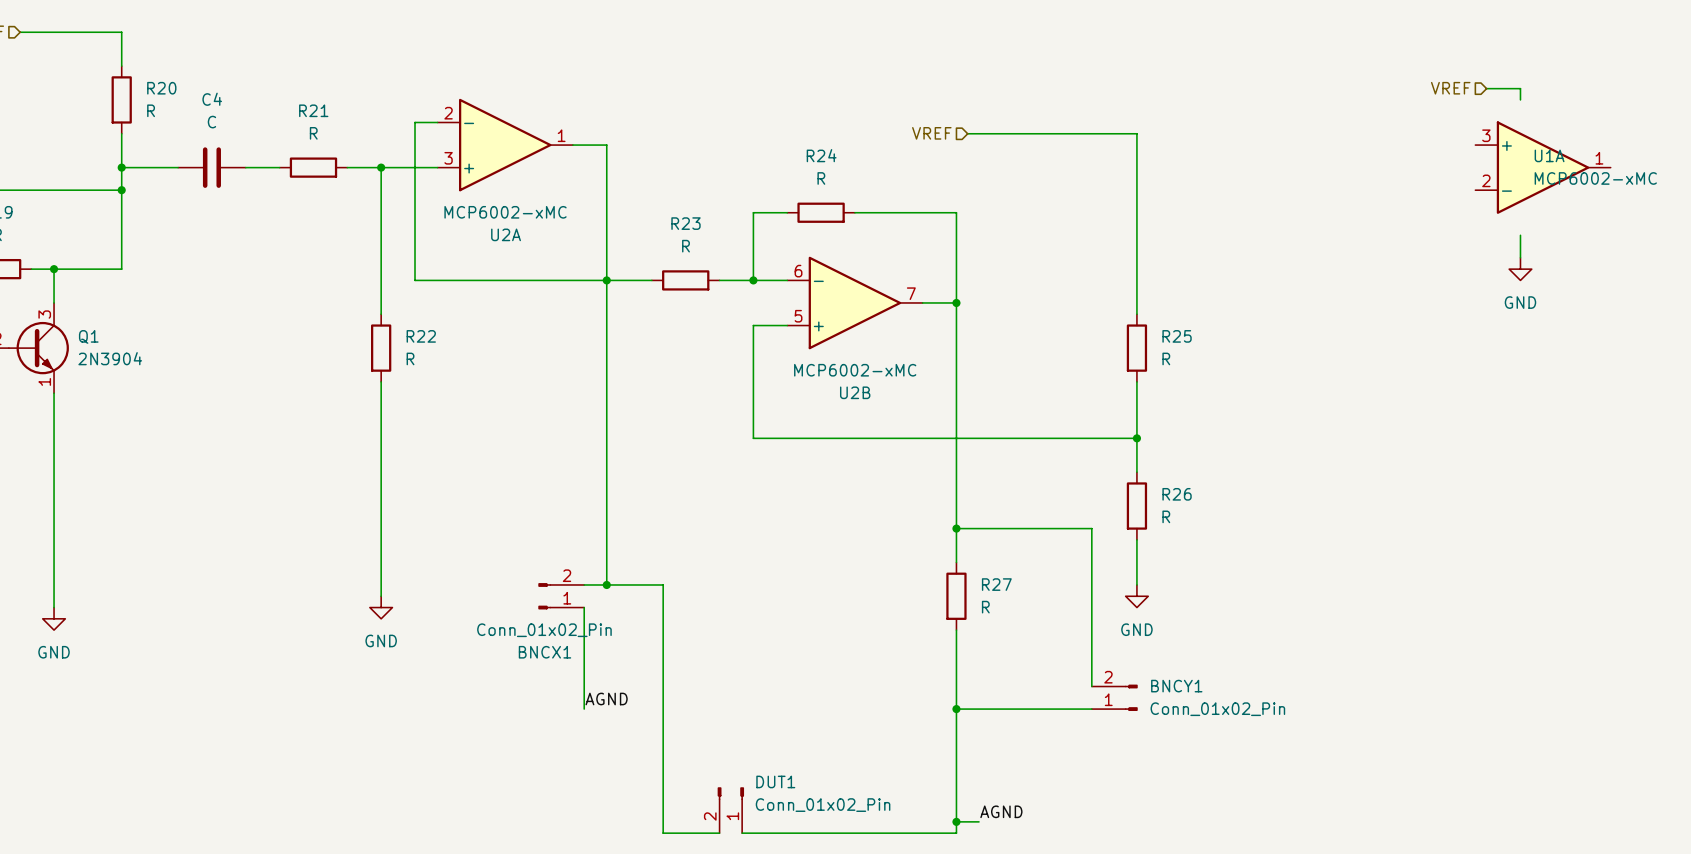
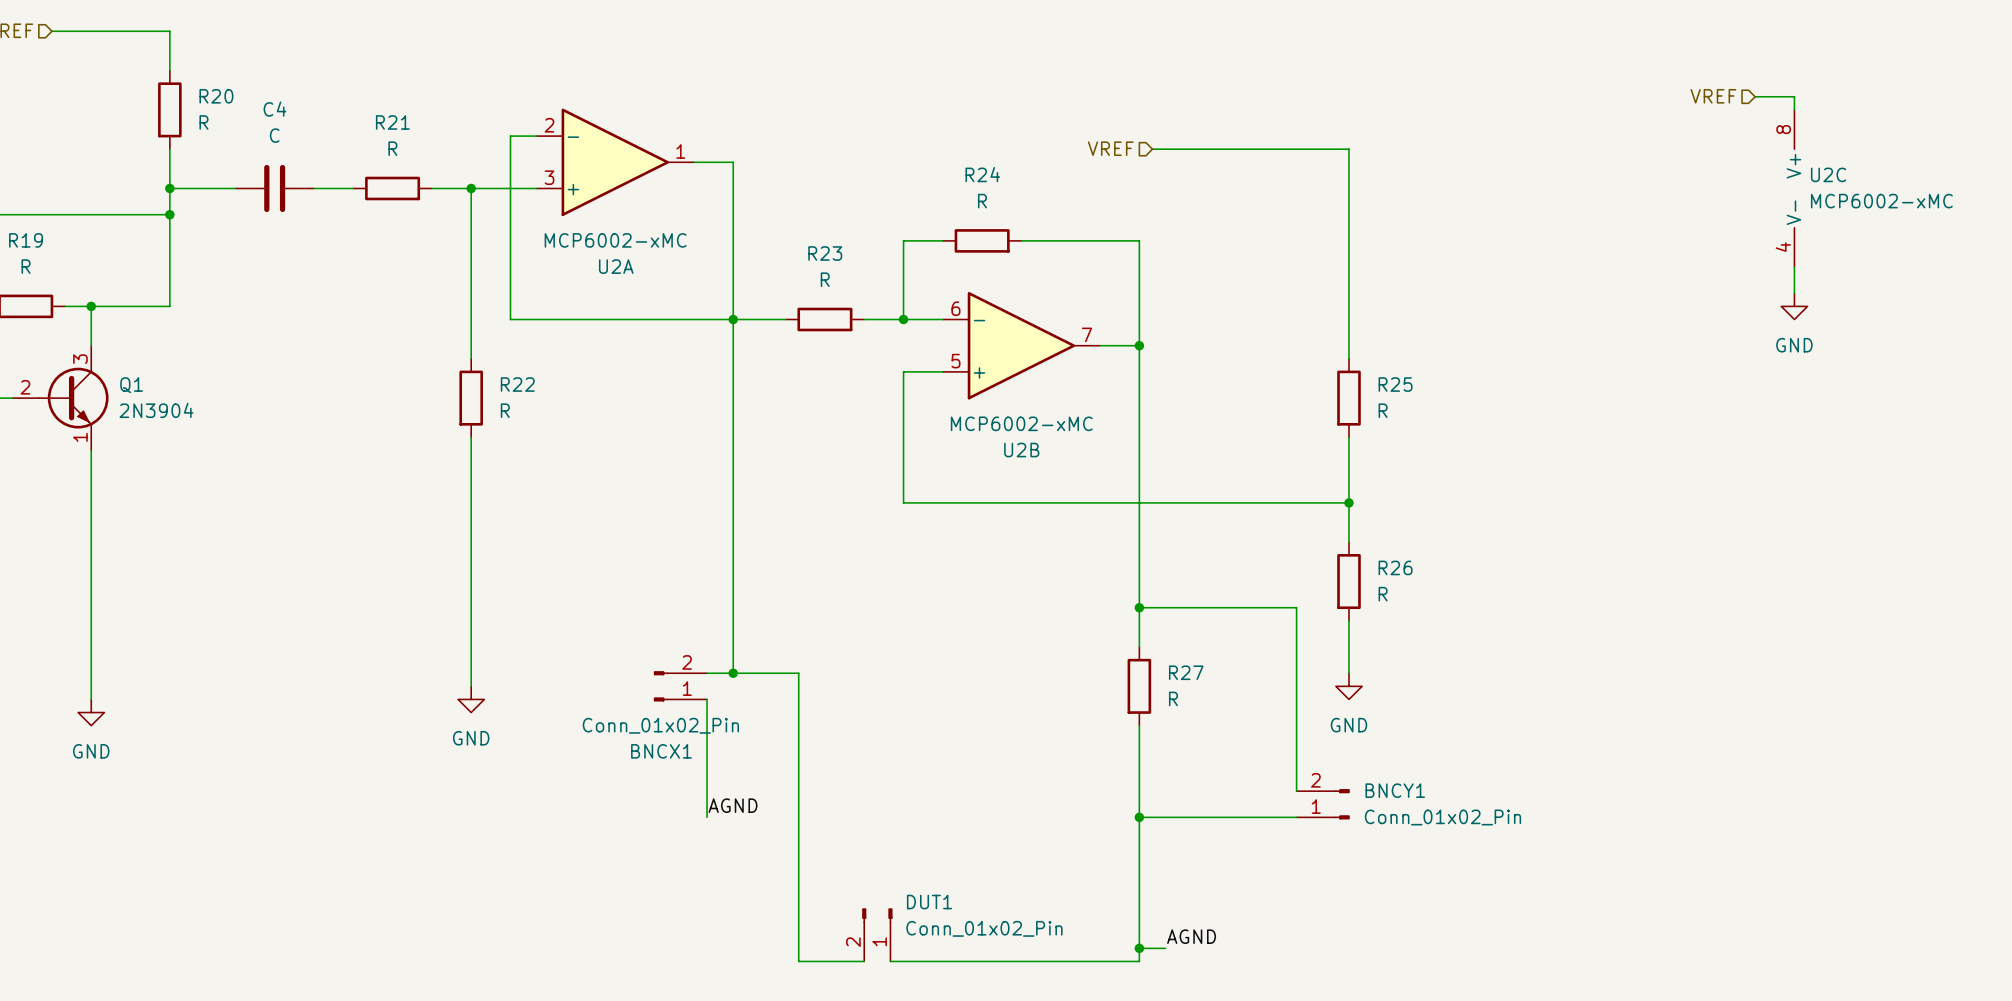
U2C: none -> MCP6002-xMC (1794, 188)
U1A: MCP6002-xMC (1543, 167) -> none

